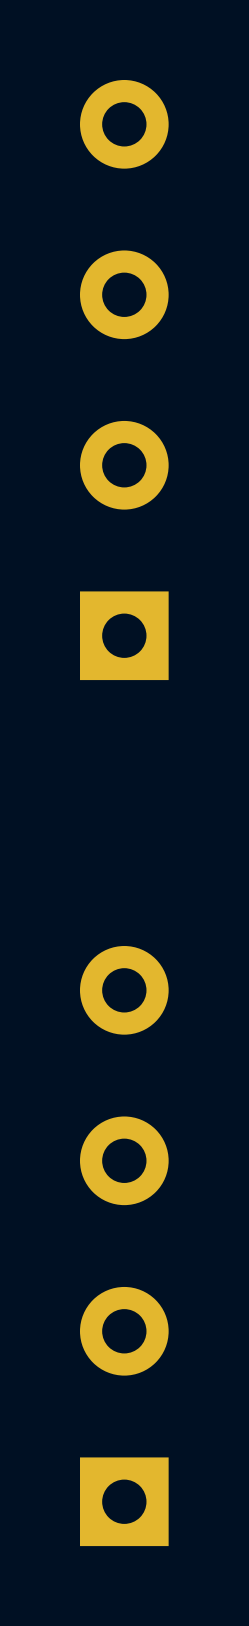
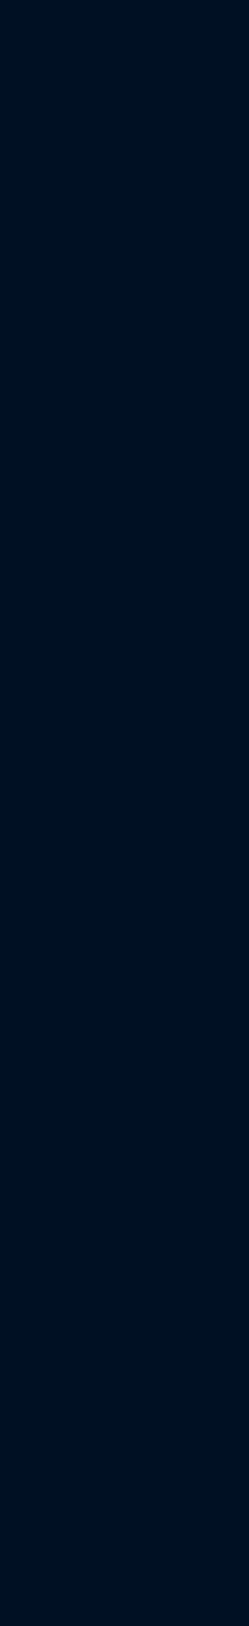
part: (124, 380) -> none
part: (124, 1246) -> none

